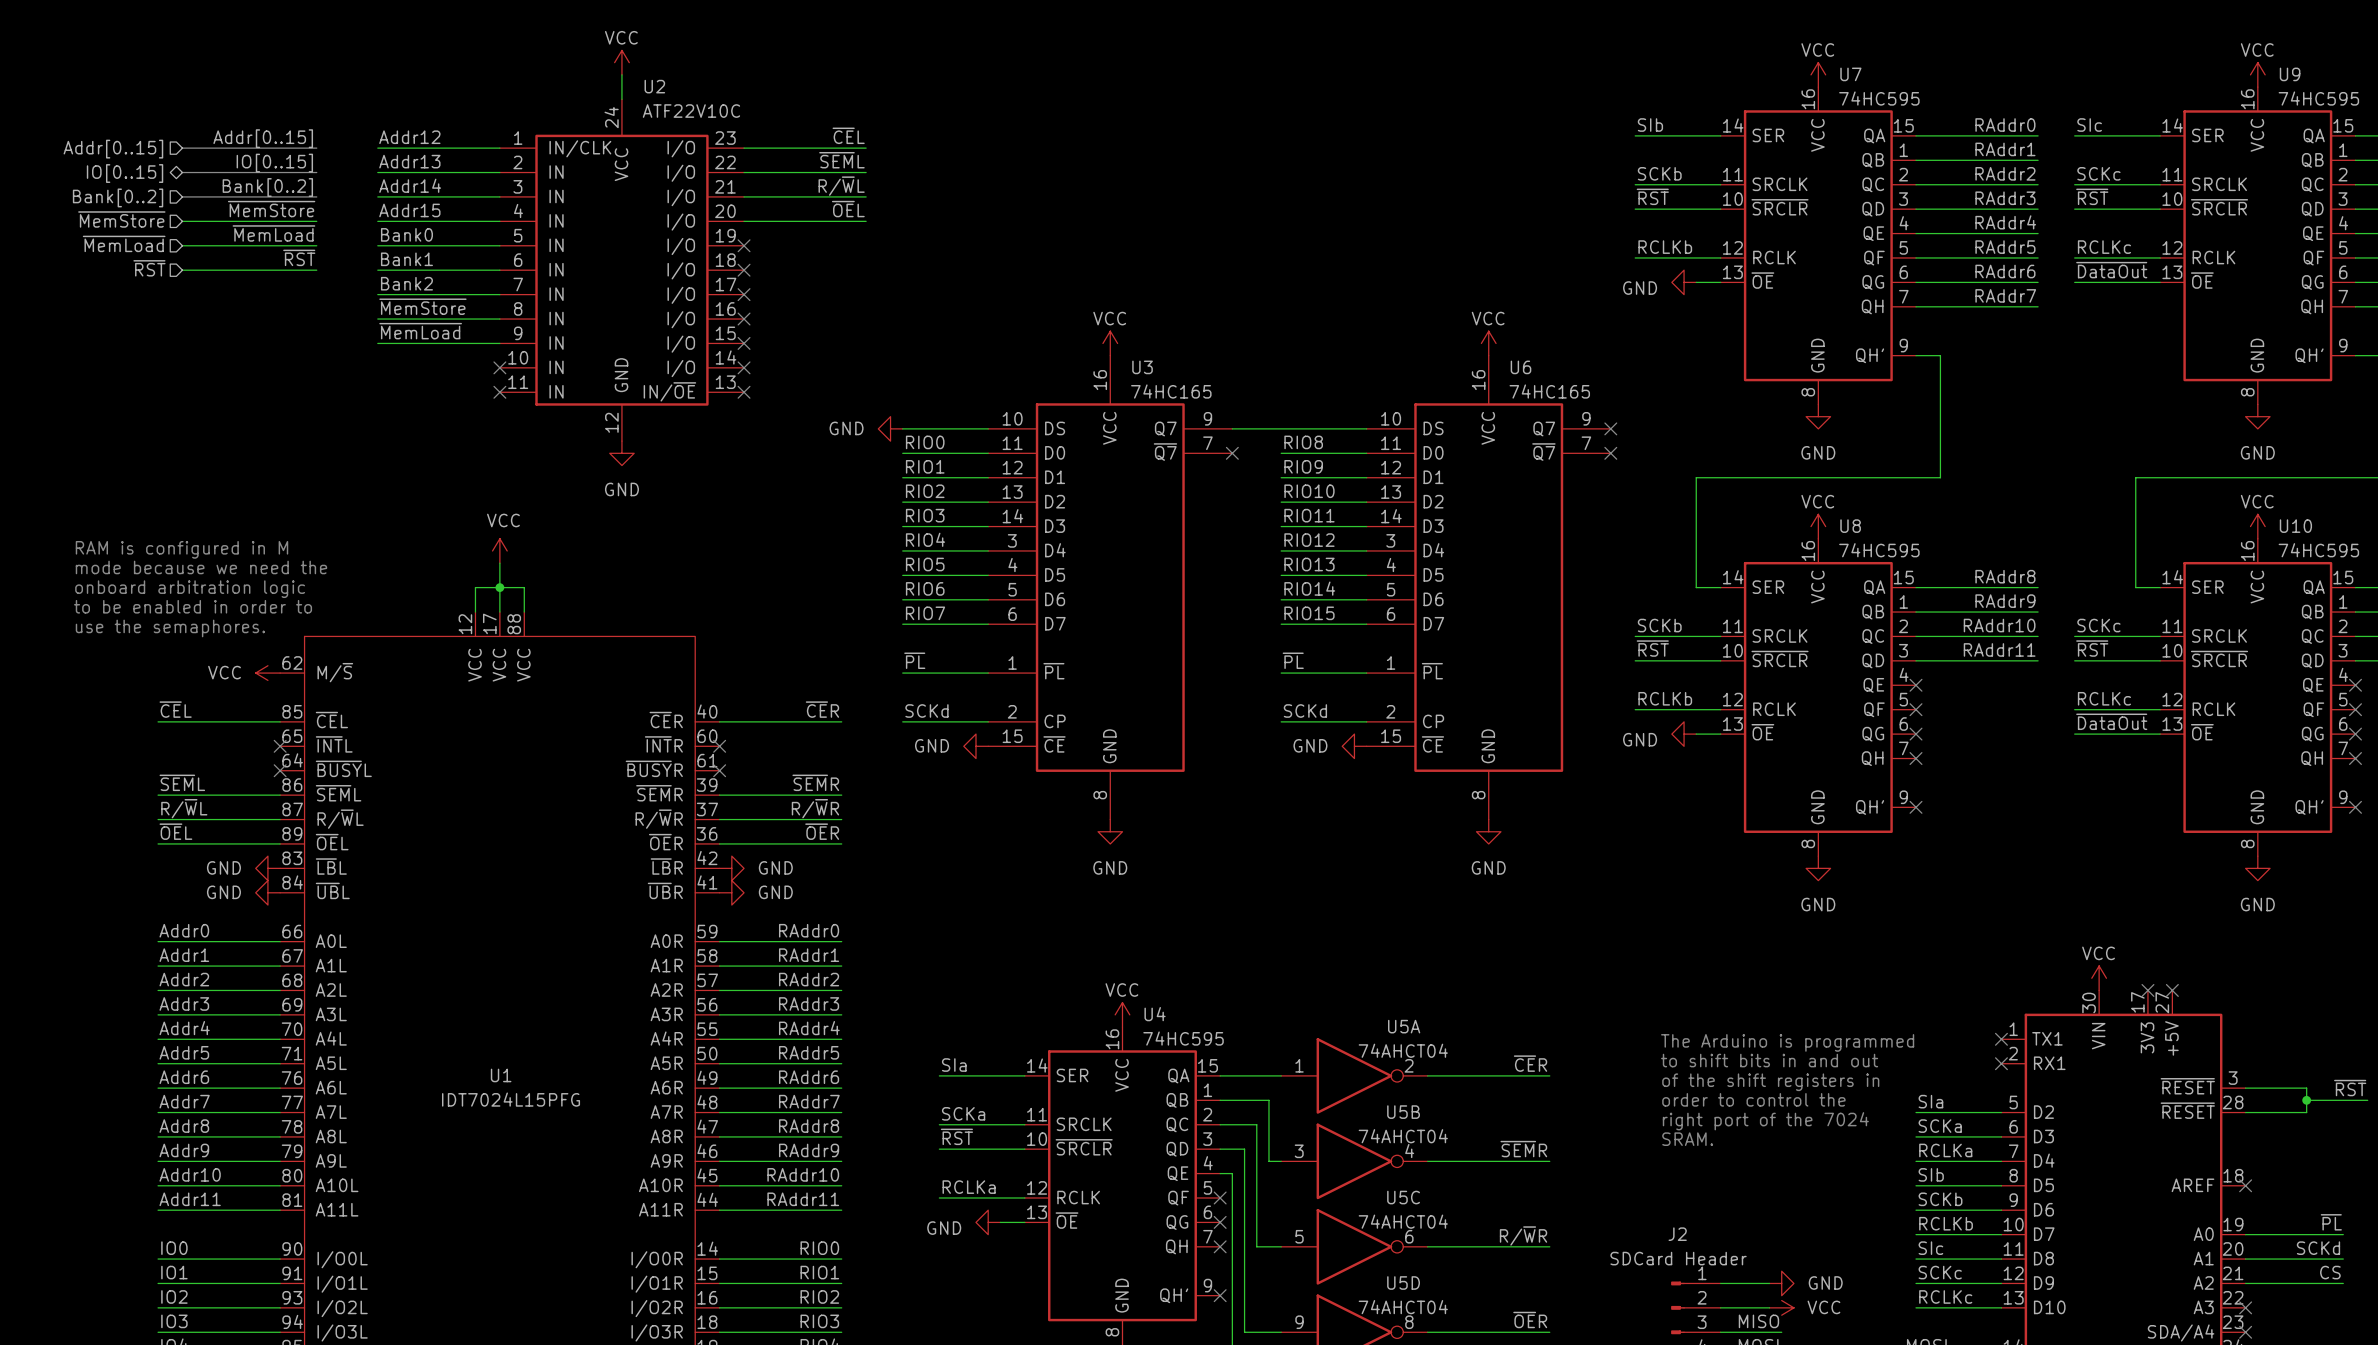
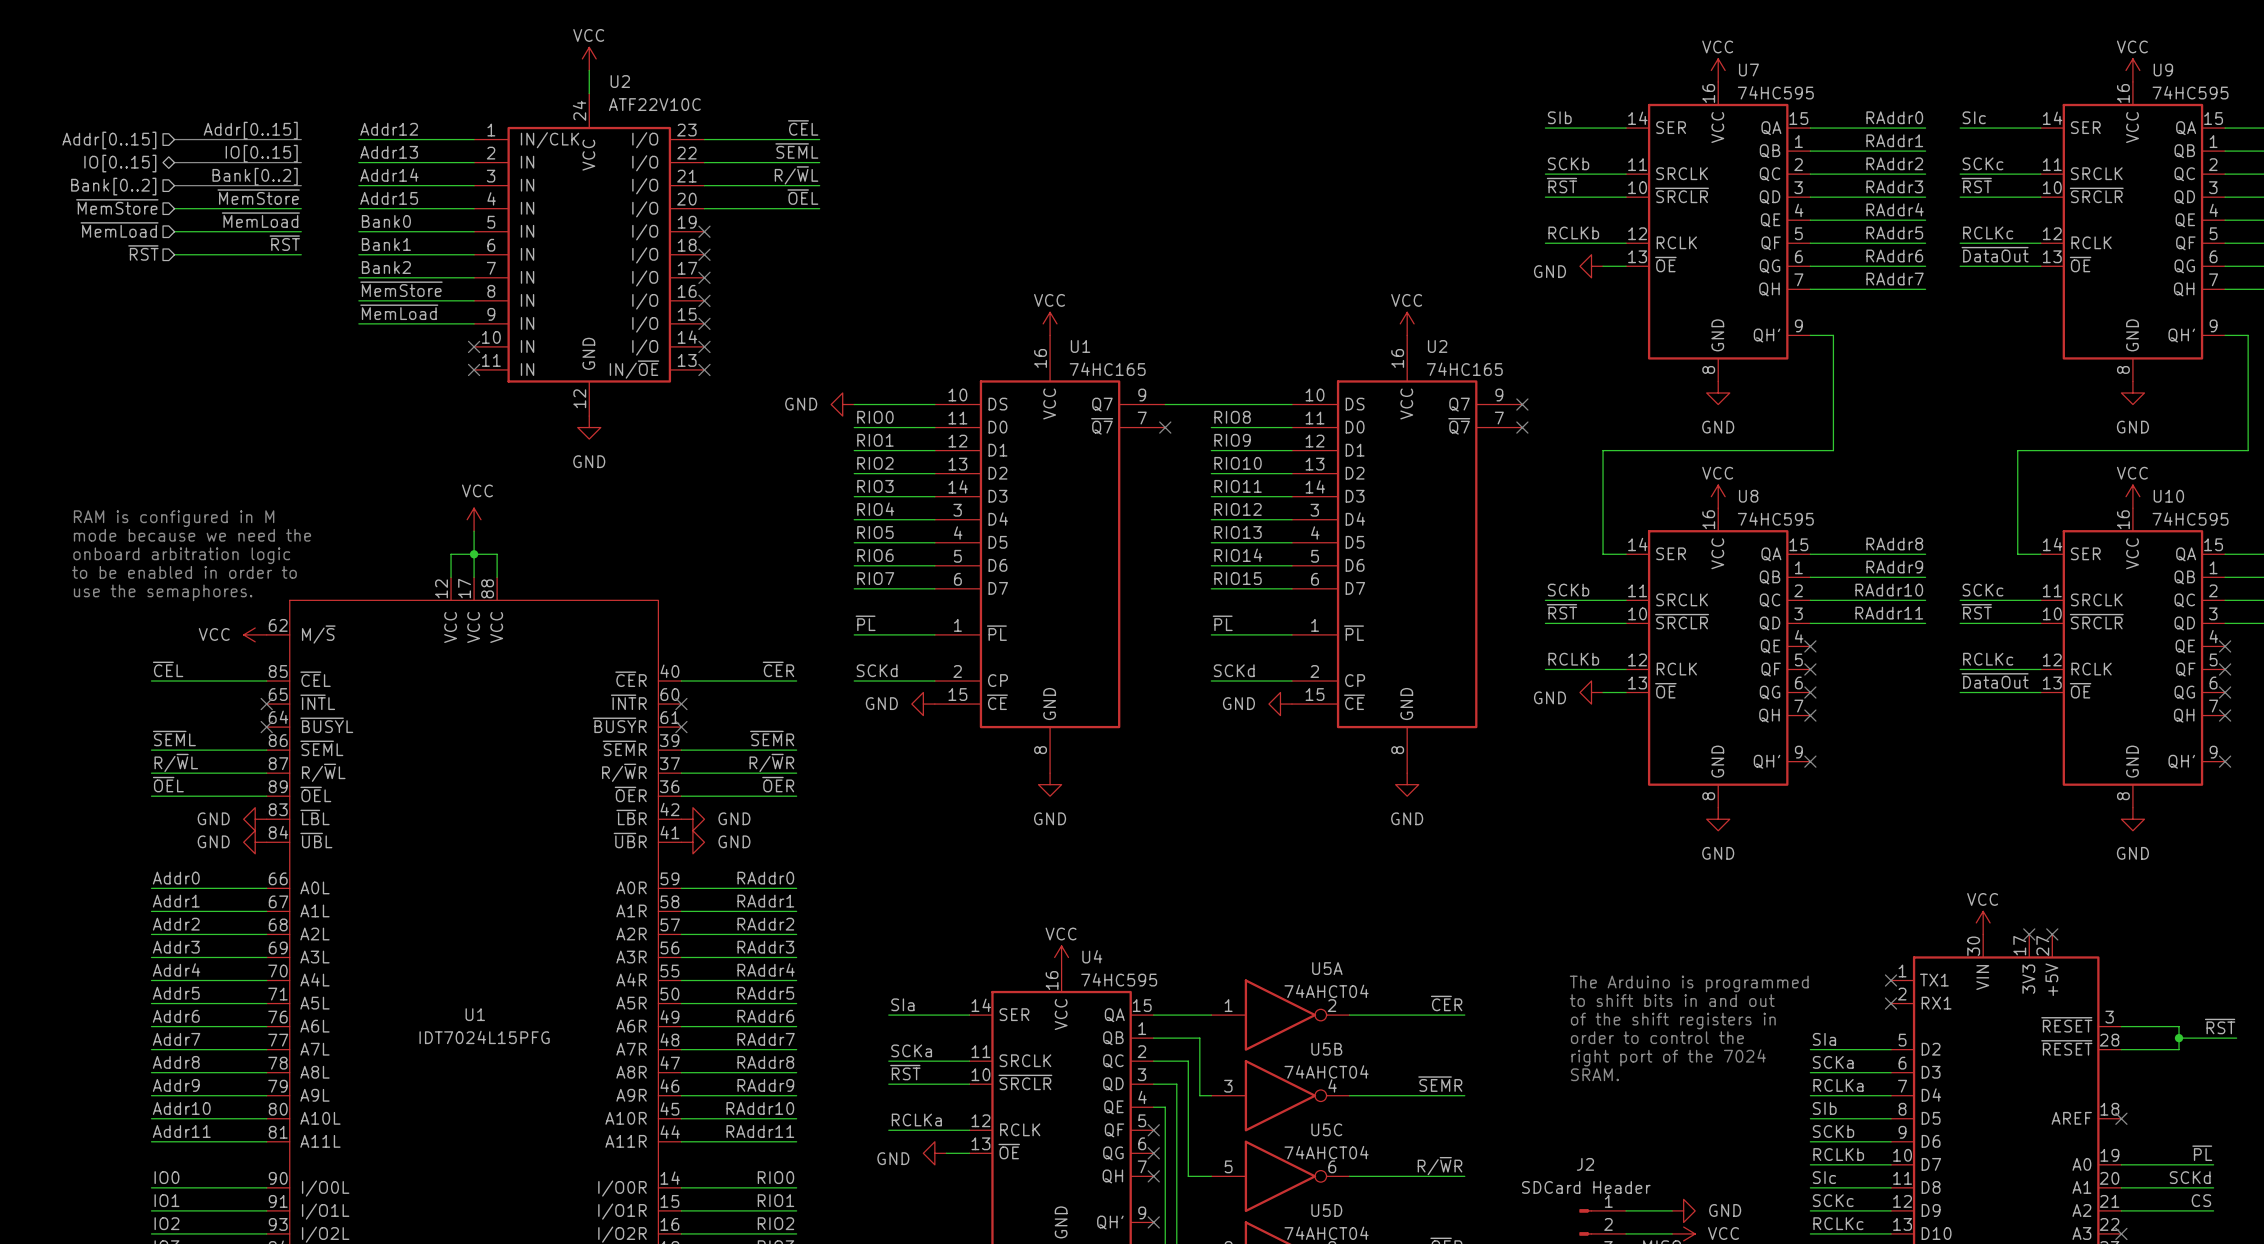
U3 name: U3 (1142, 367) -> U1 (1080, 346)
U6 name: U6 (1520, 367) -> U2 (1437, 346)

